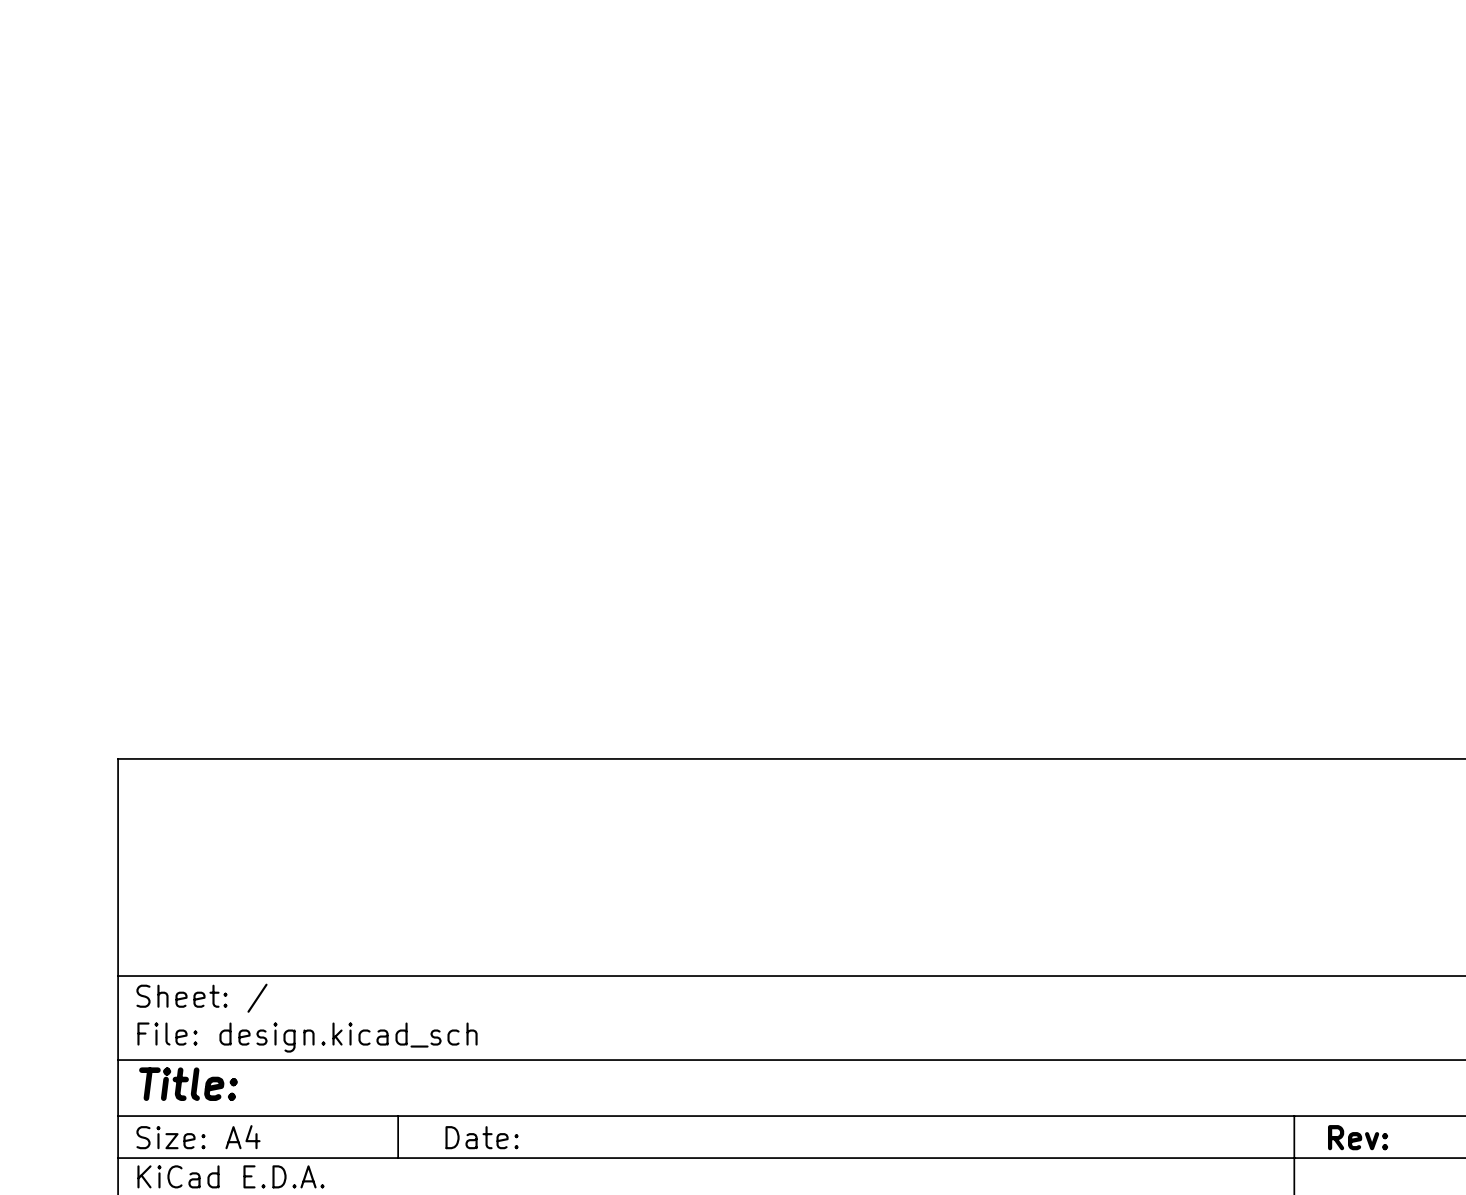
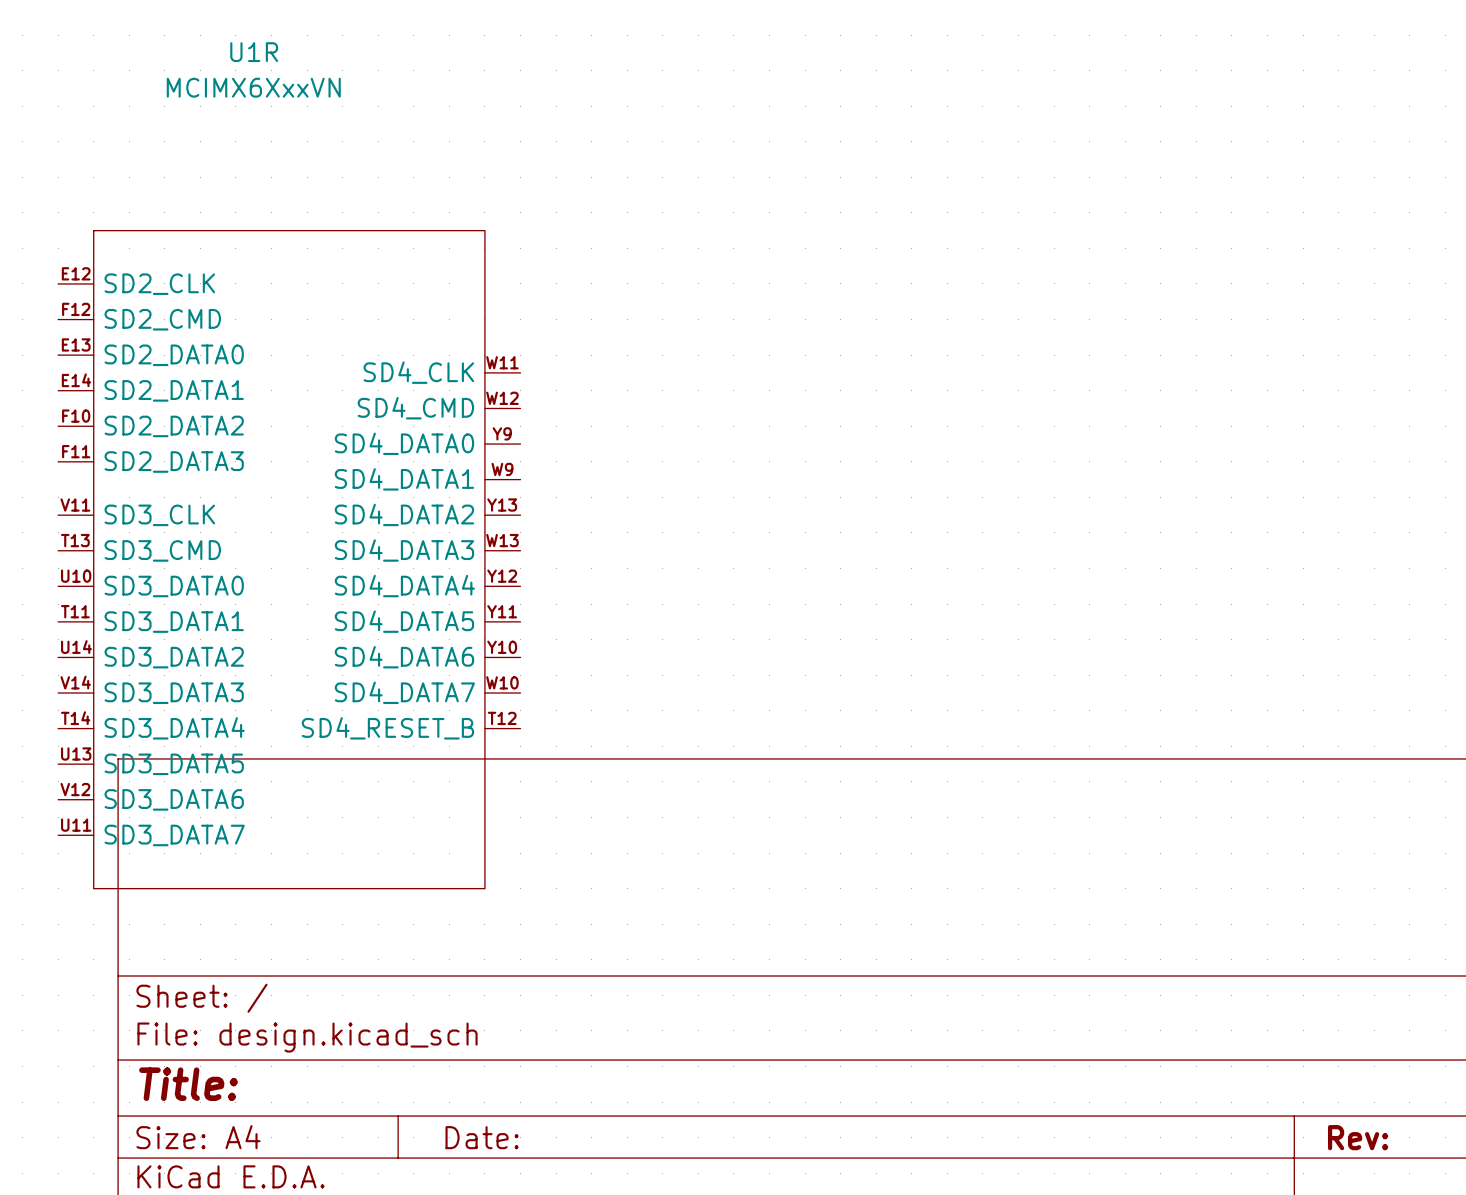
U1R: none -> MCIMX6XxxVN (271, 506)

